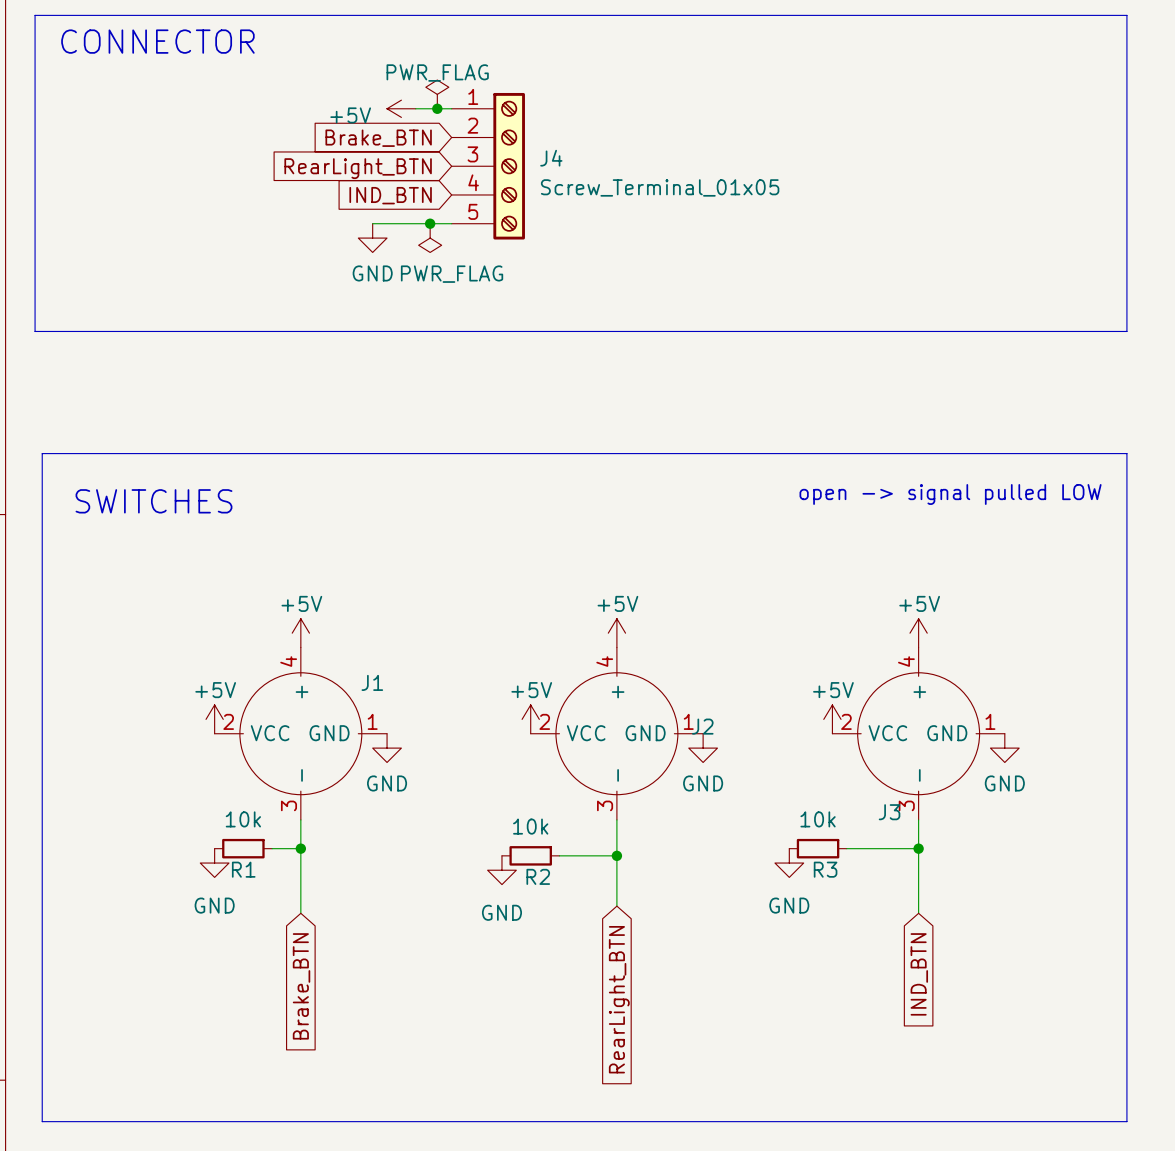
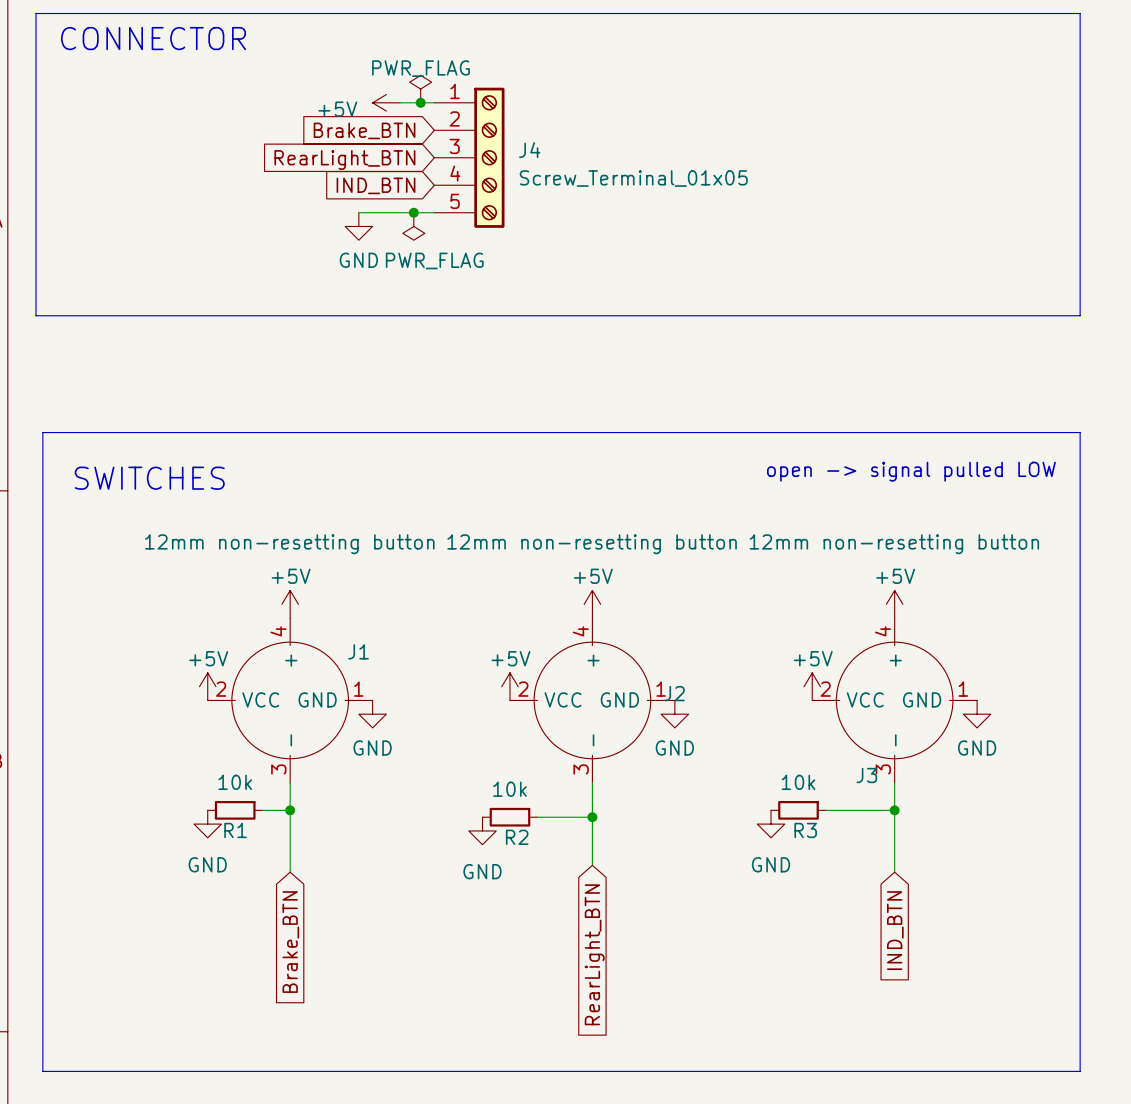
J1 value: none -> 12mm non-resetting button (289, 544)
J2 value: none -> 12mm non-resetting button (592, 544)
J3 value: none -> 12mm non-resetting button (894, 544)
power symbol position: +5V (918, 633) -> +5V (894, 604)
power symbol position: +5V (832, 719) -> +5V (812, 686)
J3 position: (918, 733) -> (894, 700)
power symbol position: GND (1004, 748) -> GND (977, 714)
wire: (918, 819) (918, 913) -> (894, 782) (894, 872)
R3 position: (818, 848) -> (798, 810)
junction position: (918, 848) -> (894, 810)
power symbol position: GND (789, 863) -> GND (771, 824)
global label position: IND_BTN (919, 974) -> IND_BTN (895, 930)

